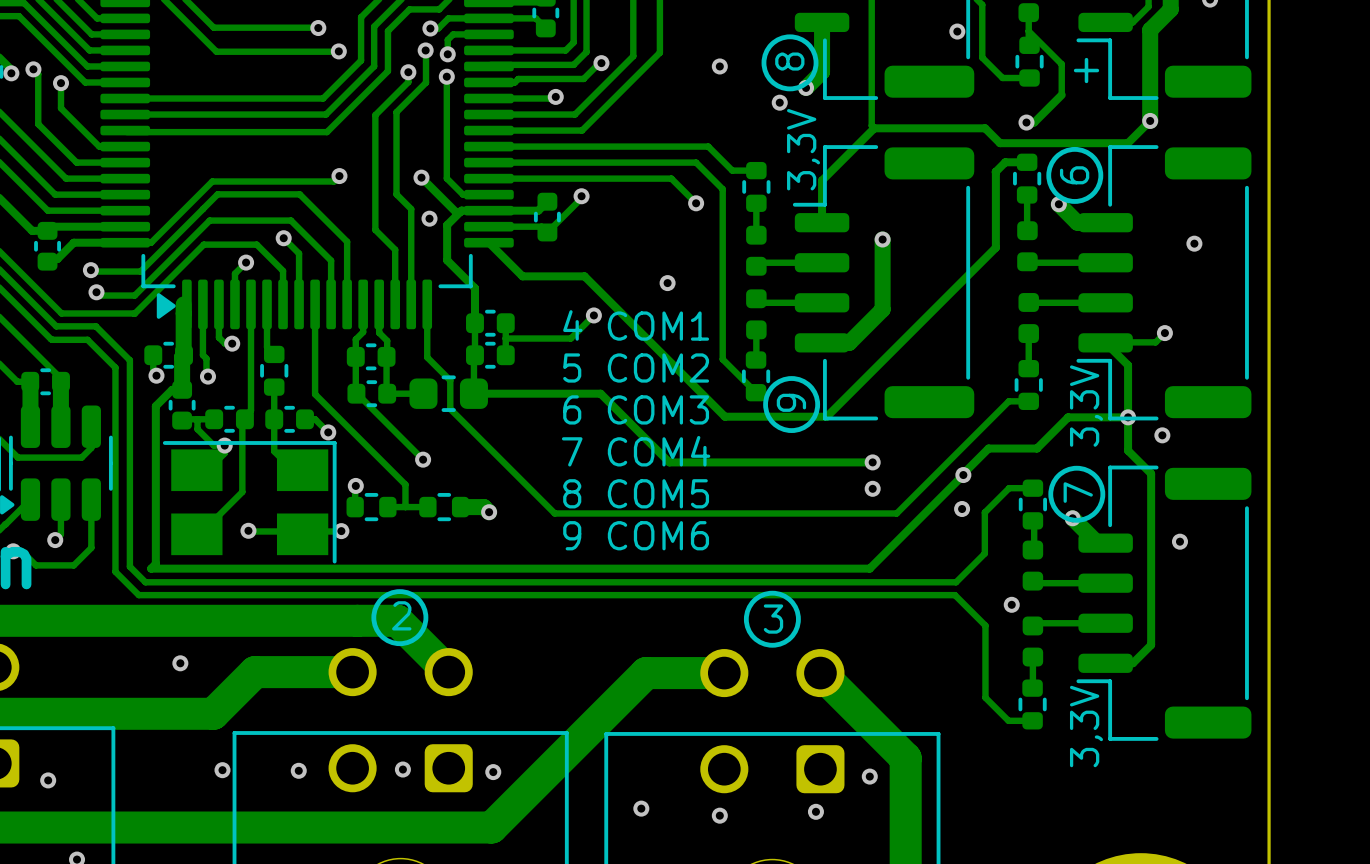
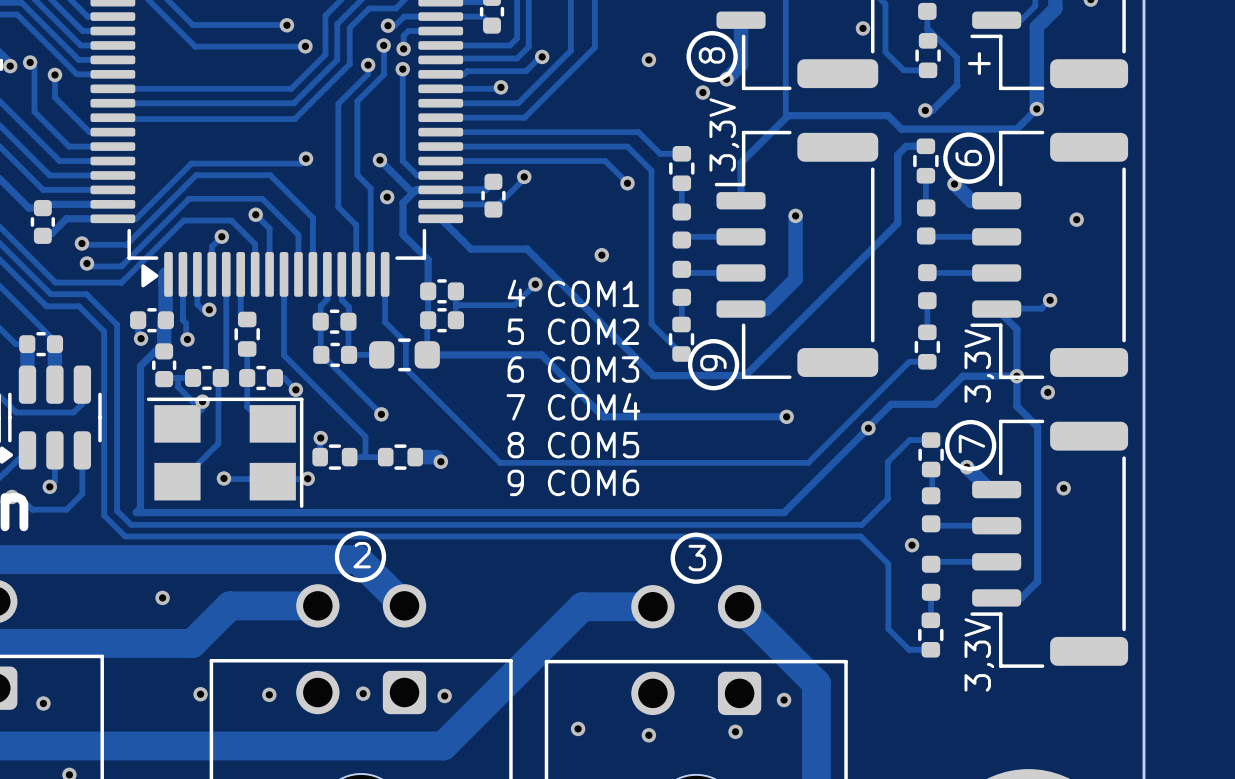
via: (872, 488) -> none
via: (962, 509) -> none

